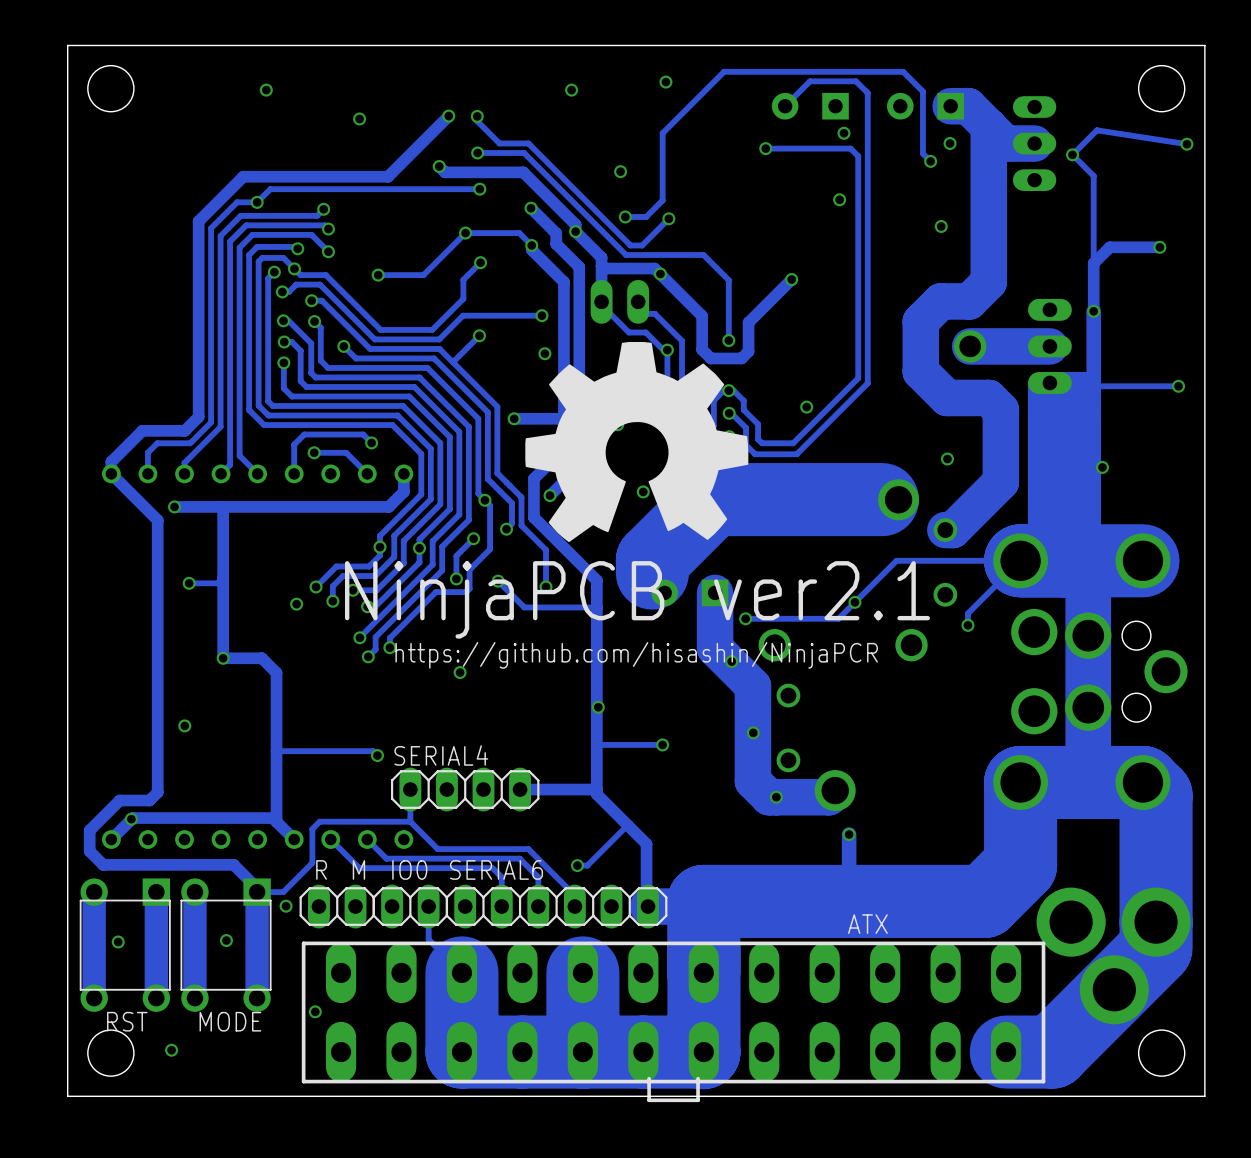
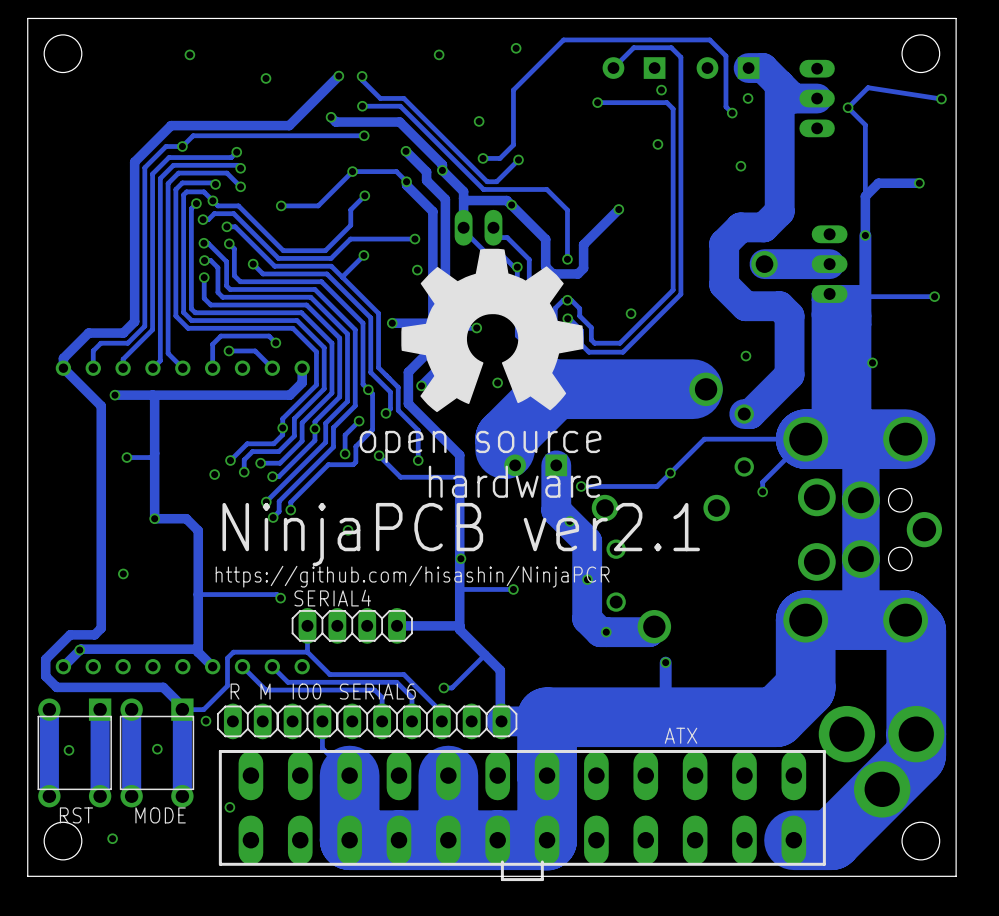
drawing shape: [525, 342, 749, 543] -> [359, 248, 602, 498]
text position: NinjaPCB ver2.1 (637, 599) -> NinjaPCB ver2.1 (461, 534)
text position: https://github.com/hisashin/NinjaPCR (636, 655) -> https://github.com/hisashin/NinjaPCR (412, 576)

